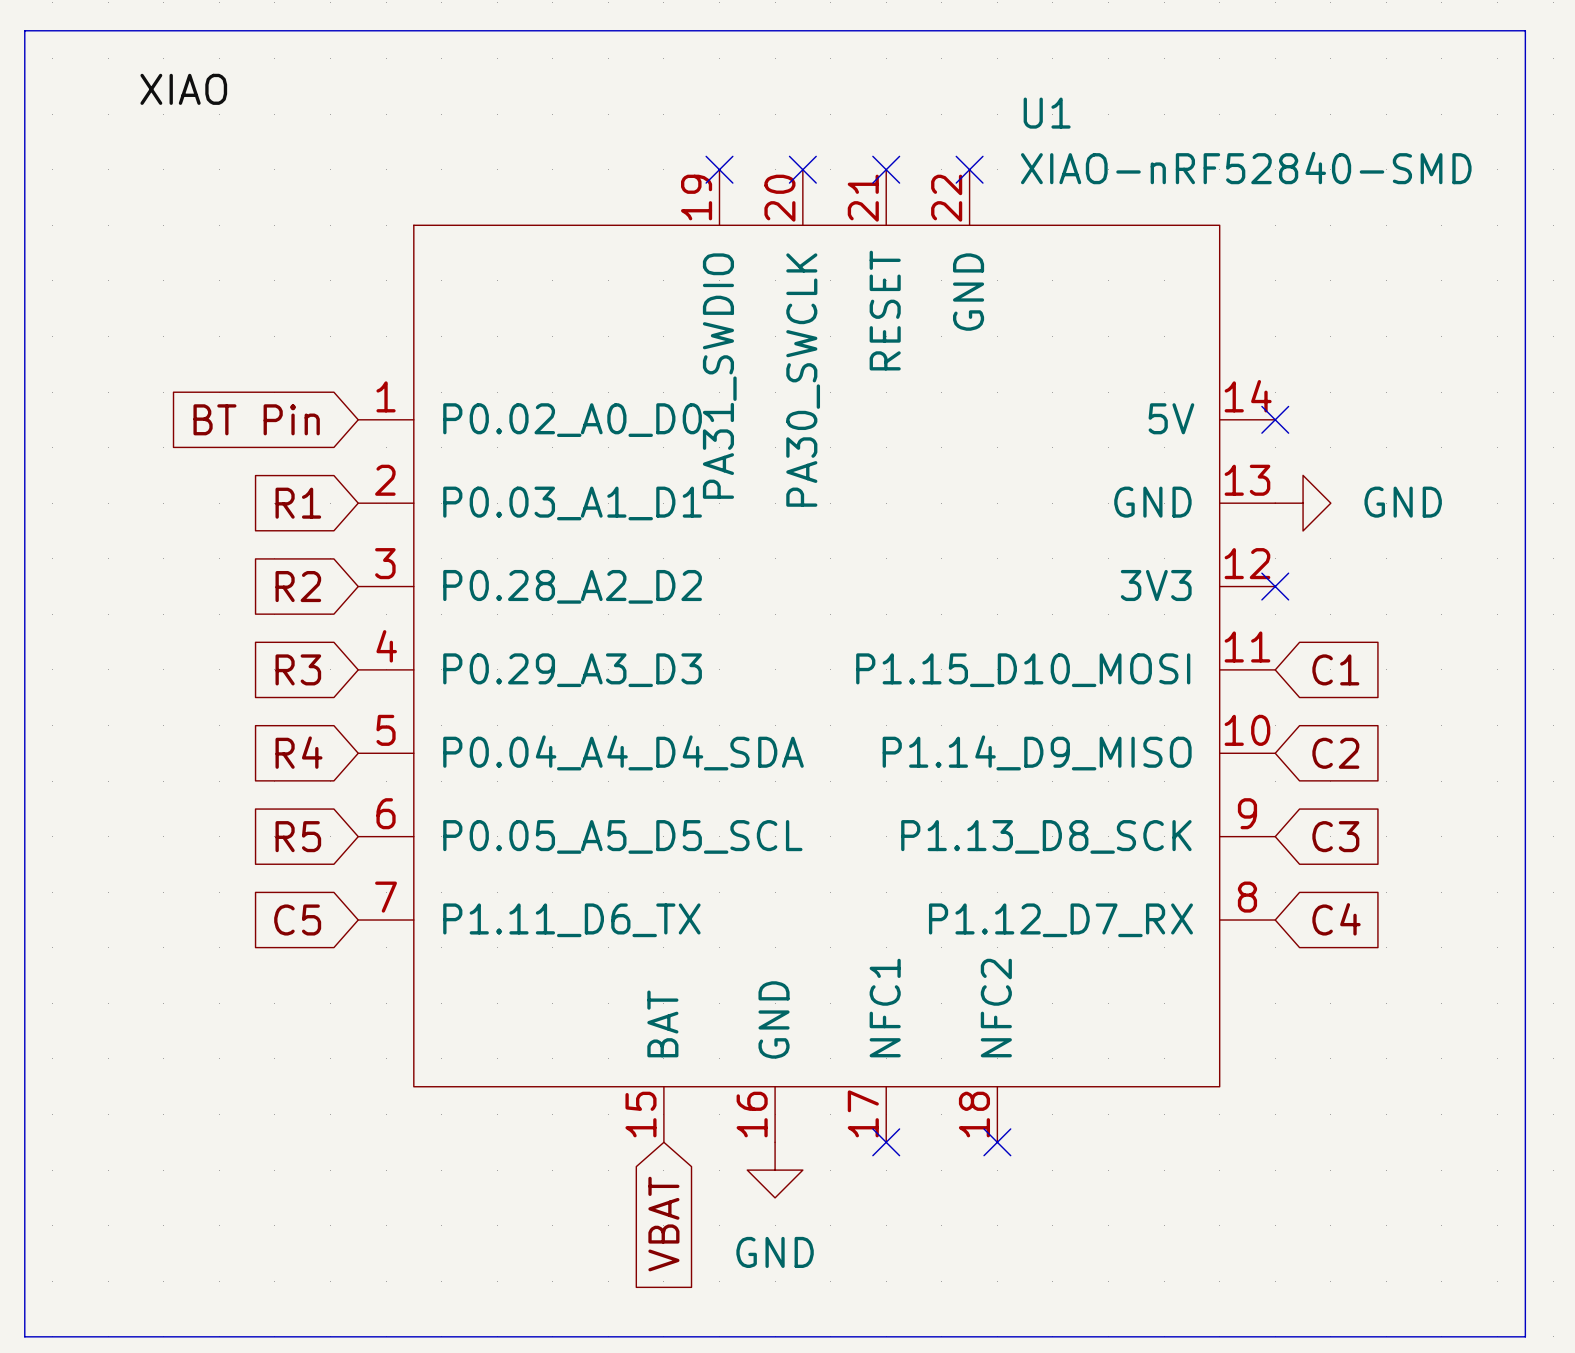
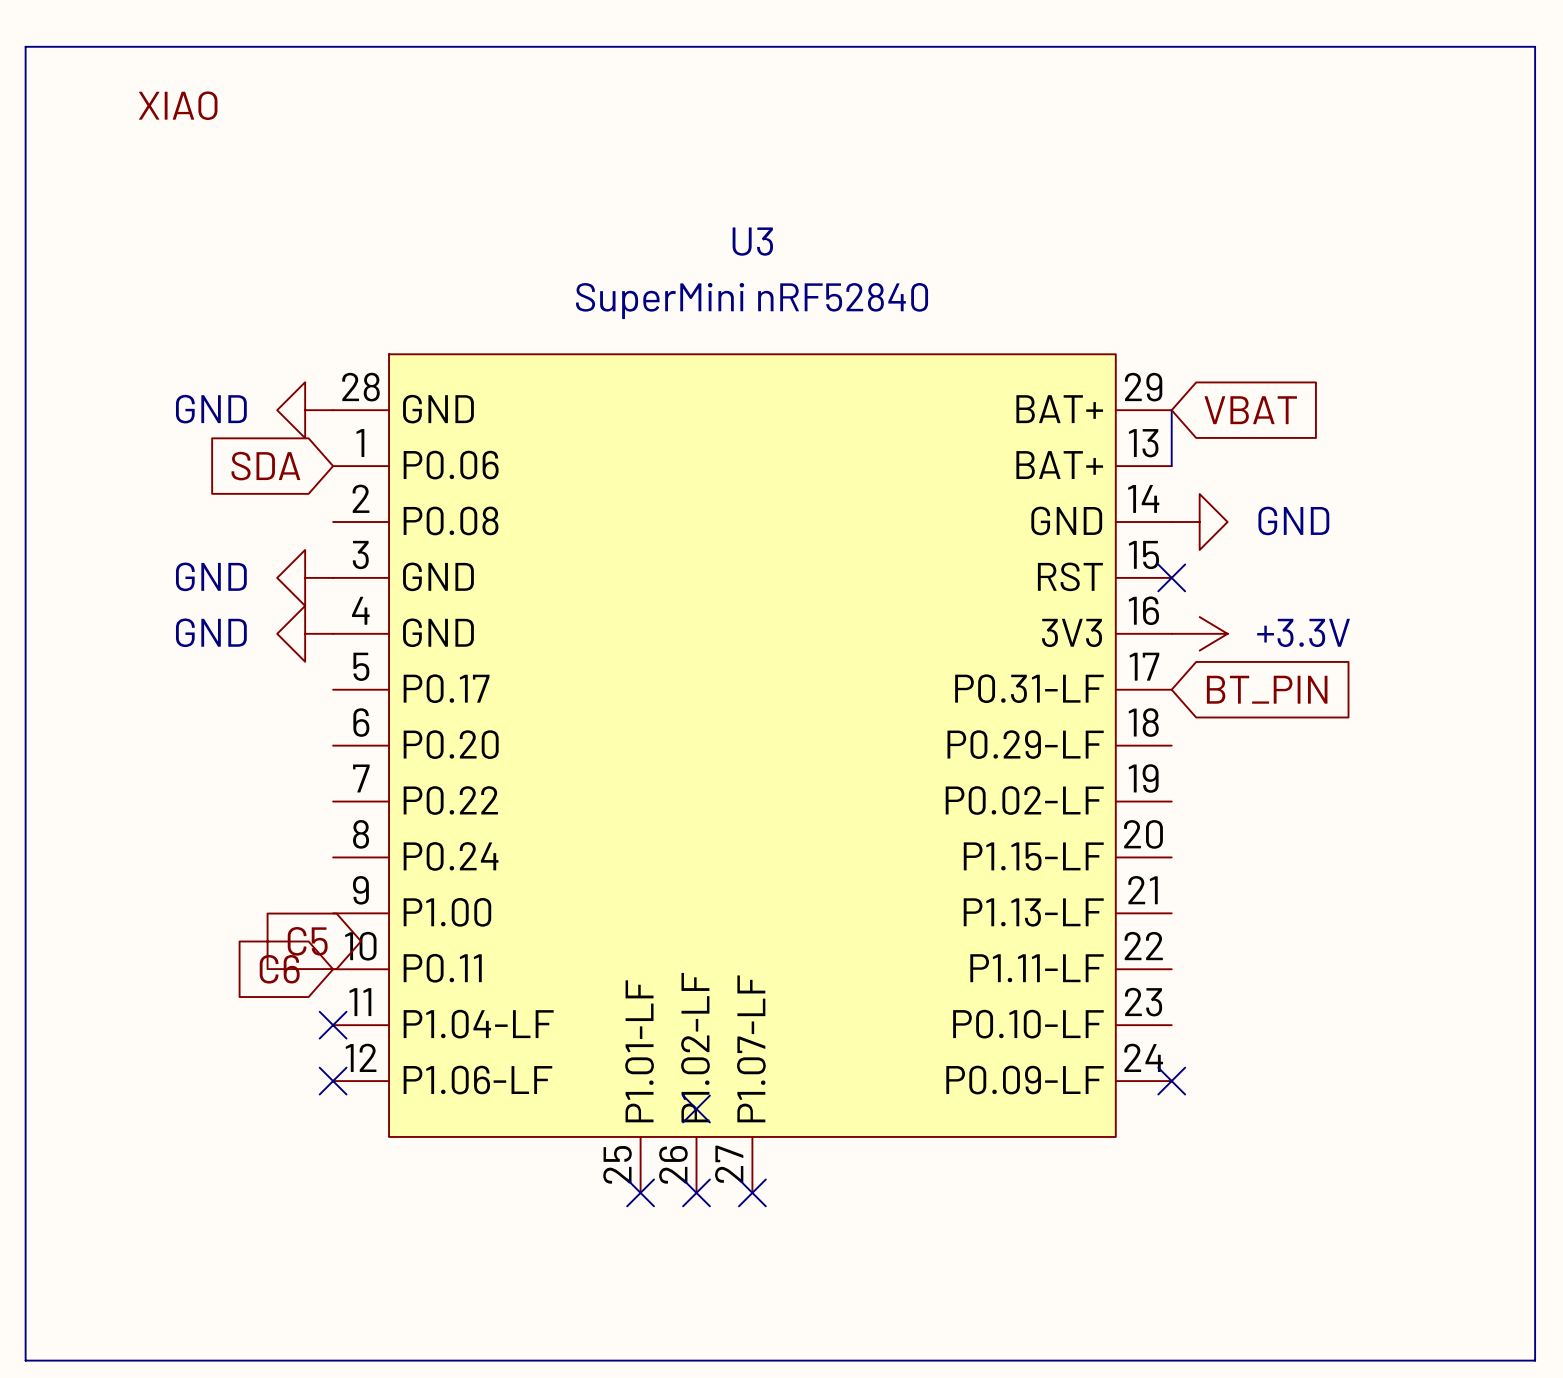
no-connect mark: (719, 169) -> none
no-connect mark: (802, 169) -> none
no-connect mark: (886, 169) -> none
no-connect mark: (969, 169) -> none
power symbol: none -> GND (305, 410)
wire: none -> (1171, 410) (1171, 466)
global label: none -> VBAT (1250, 410)
global label: BT Pin (256, 419) -> none
no-connect mark: (1275, 419) -> none
global label: none -> SDA (265, 466)
global label: R1 (298, 503) -> none
power symbol position: GND (1303, 503) -> GND (1199, 522)
power symbol: none -> GND (305, 577)
no-connect mark: none -> (1171, 577)
global label: R2 (298, 586) -> none
no-connect mark: (1275, 586) -> none
power symbol: none -> GND (305, 633)
power symbol: none -> +3.3V (1199, 633)
U1: XIAO-nRF52840-SMD (816, 656) -> none
global label: R3 (298, 669) -> none
global label: C1 (1335, 669) -> none
global label: none -> BT_PIN (1267, 689)
global label: R4 (298, 752) -> none
U3: none -> SuperMini nRF52840 (752, 773)
global label: C2 (1335, 753) -> none
global label: R5 (298, 836) -> none
global label: C3 (1335, 836) -> none
global label: C4 (1336, 919) -> none
global label: none -> C6 (279, 969)
no-connect mark: none -> (333, 1025)
no-connect mark: none -> (333, 1081)
no-connect mark: none -> (1171, 1081)
no-connect mark: none -> (696, 1109)
no-connect mark: (886, 1142) -> none
no-connect mark: (997, 1142) -> none
no-connect mark: none -> (640, 1192)
no-connect mark: none -> (696, 1192)
no-connect mark: none -> (752, 1192)
power symbol: GND (775, 1170) -> none
global label: VBAT (663, 1224) -> none

